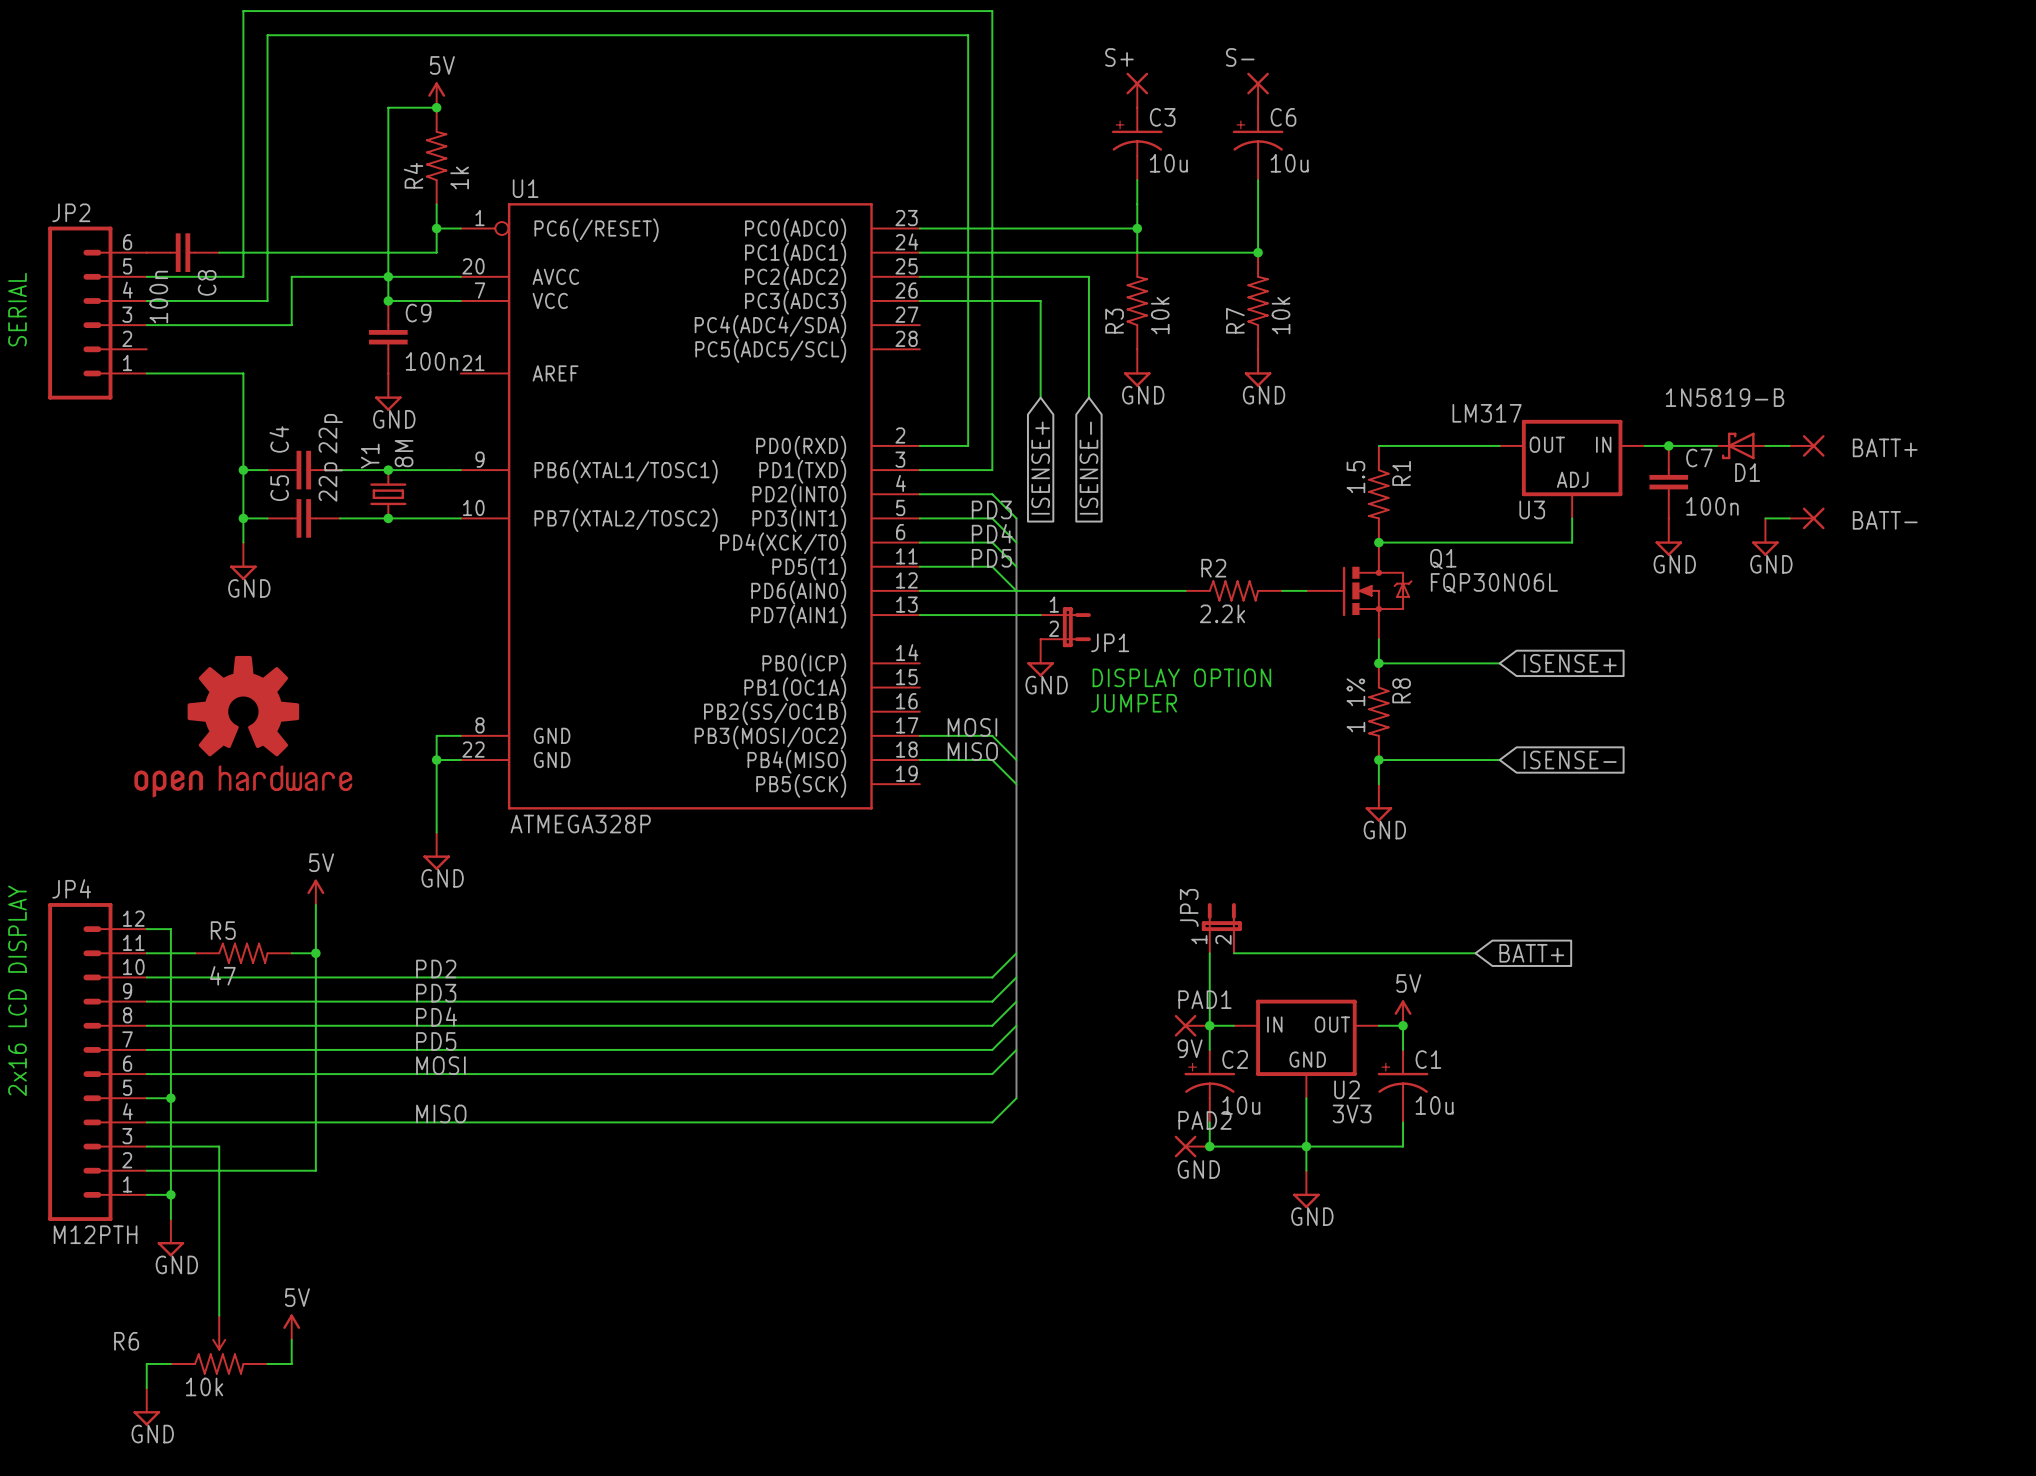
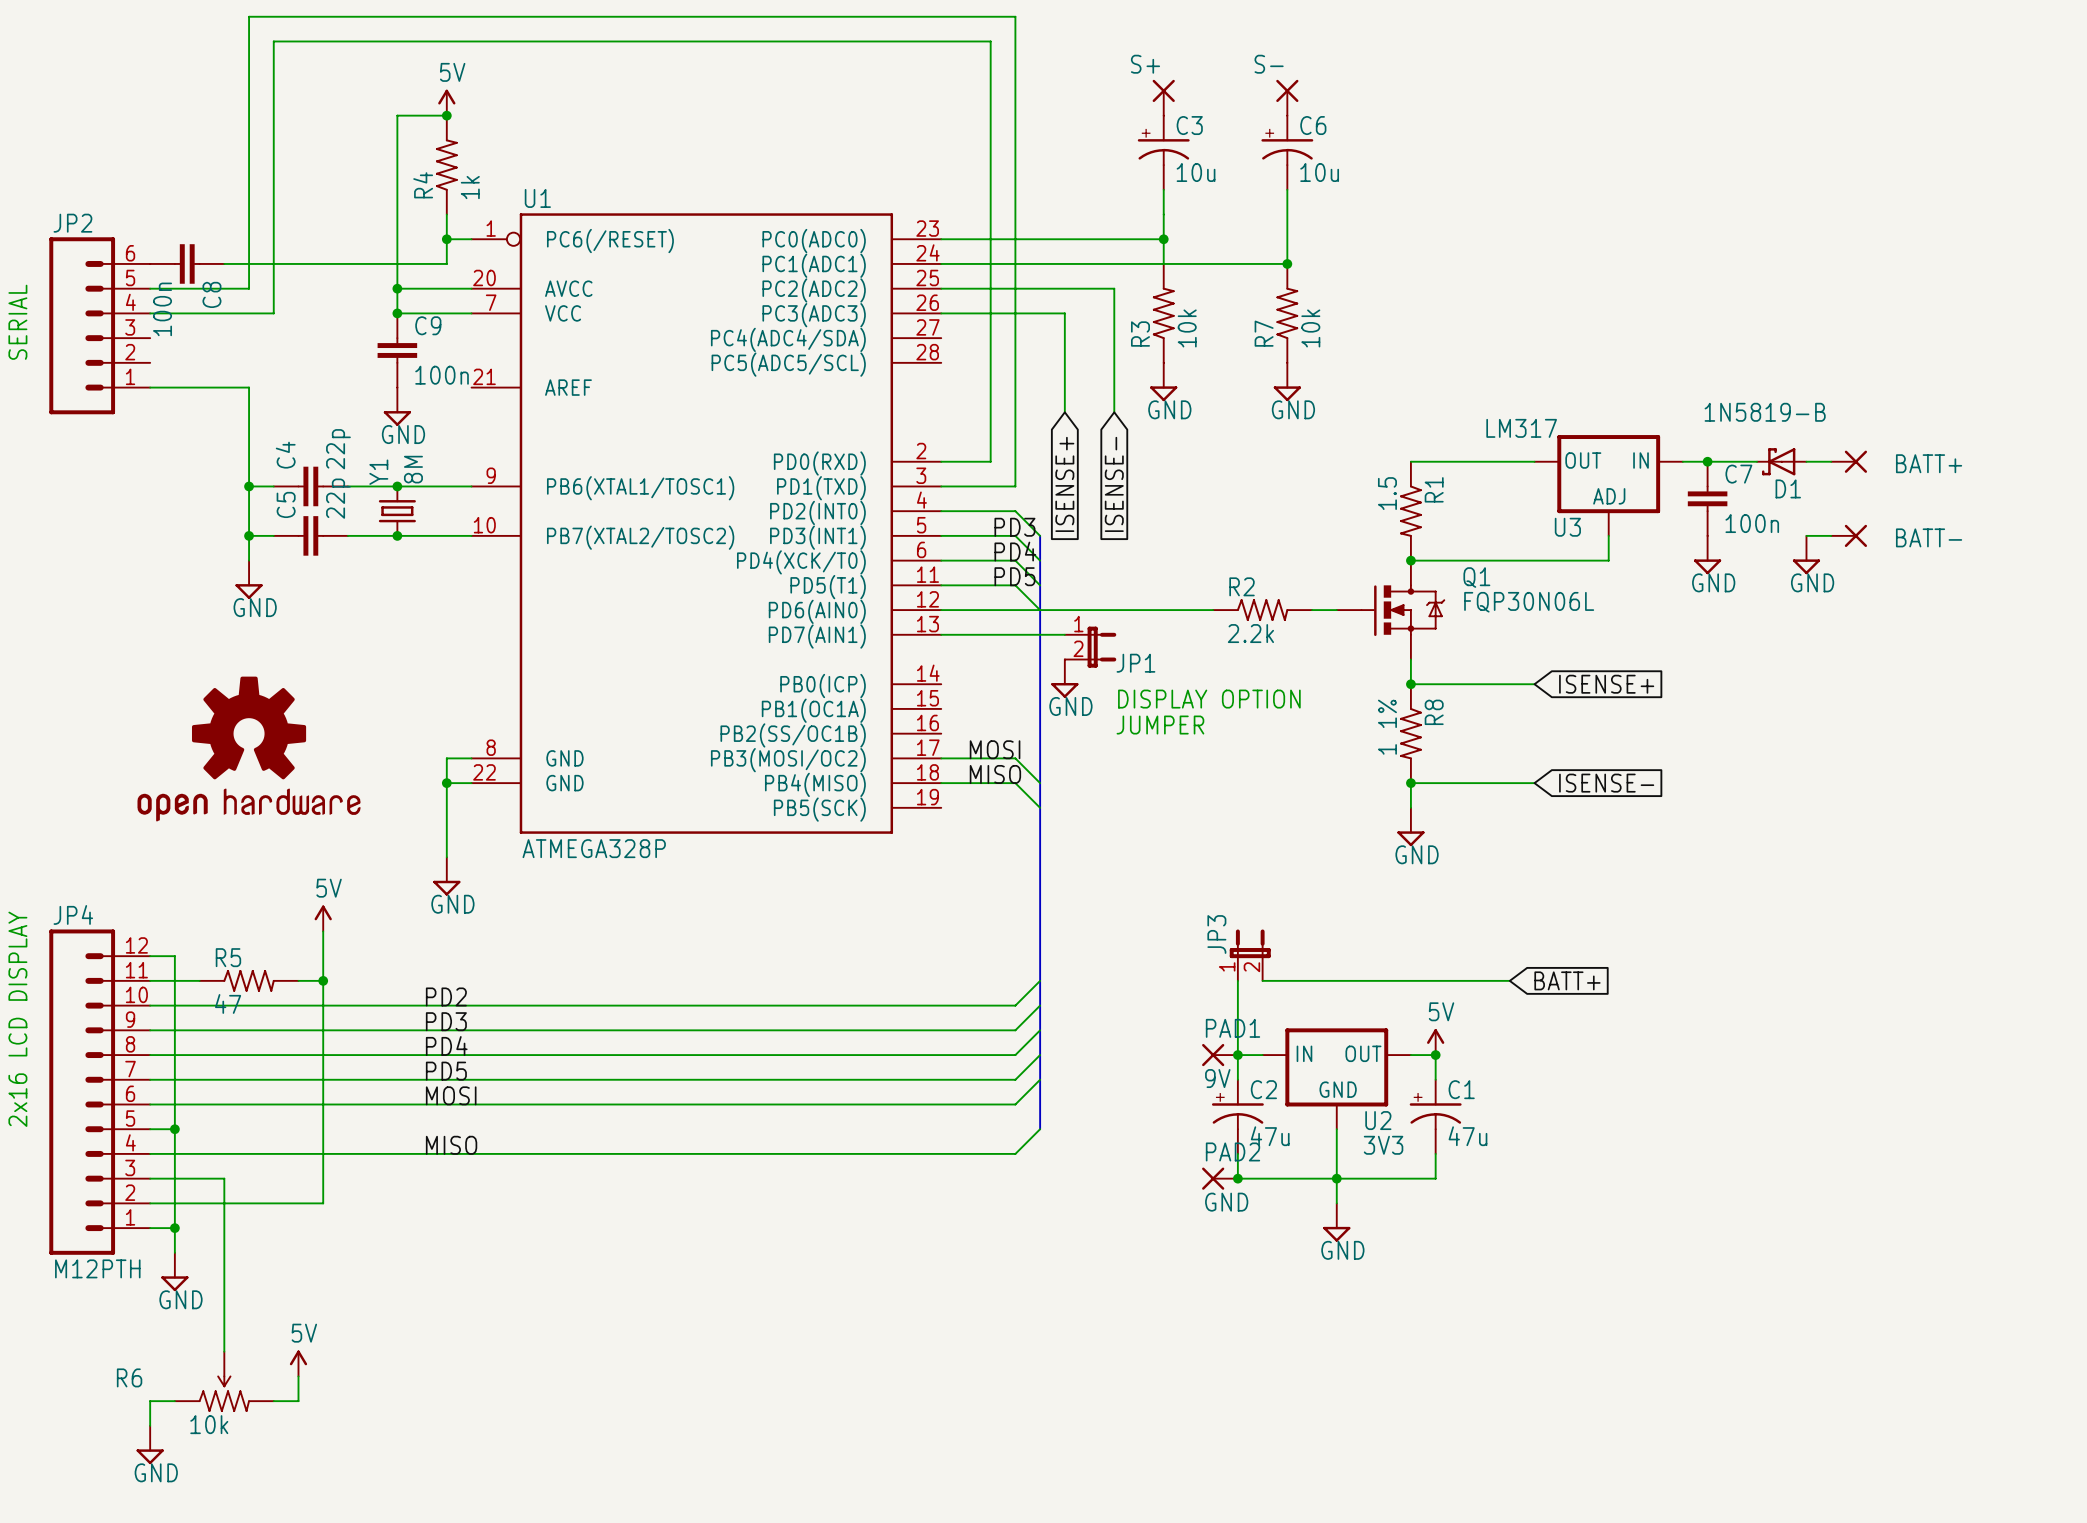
wire: (388, 276) (291, 276) (291, 325) (146, 325) -> none
C2 value: 10u (1241, 1105) -> 47u (1270, 1136)
C1 value: 10u (1434, 1105) -> 47u (1467, 1136)

